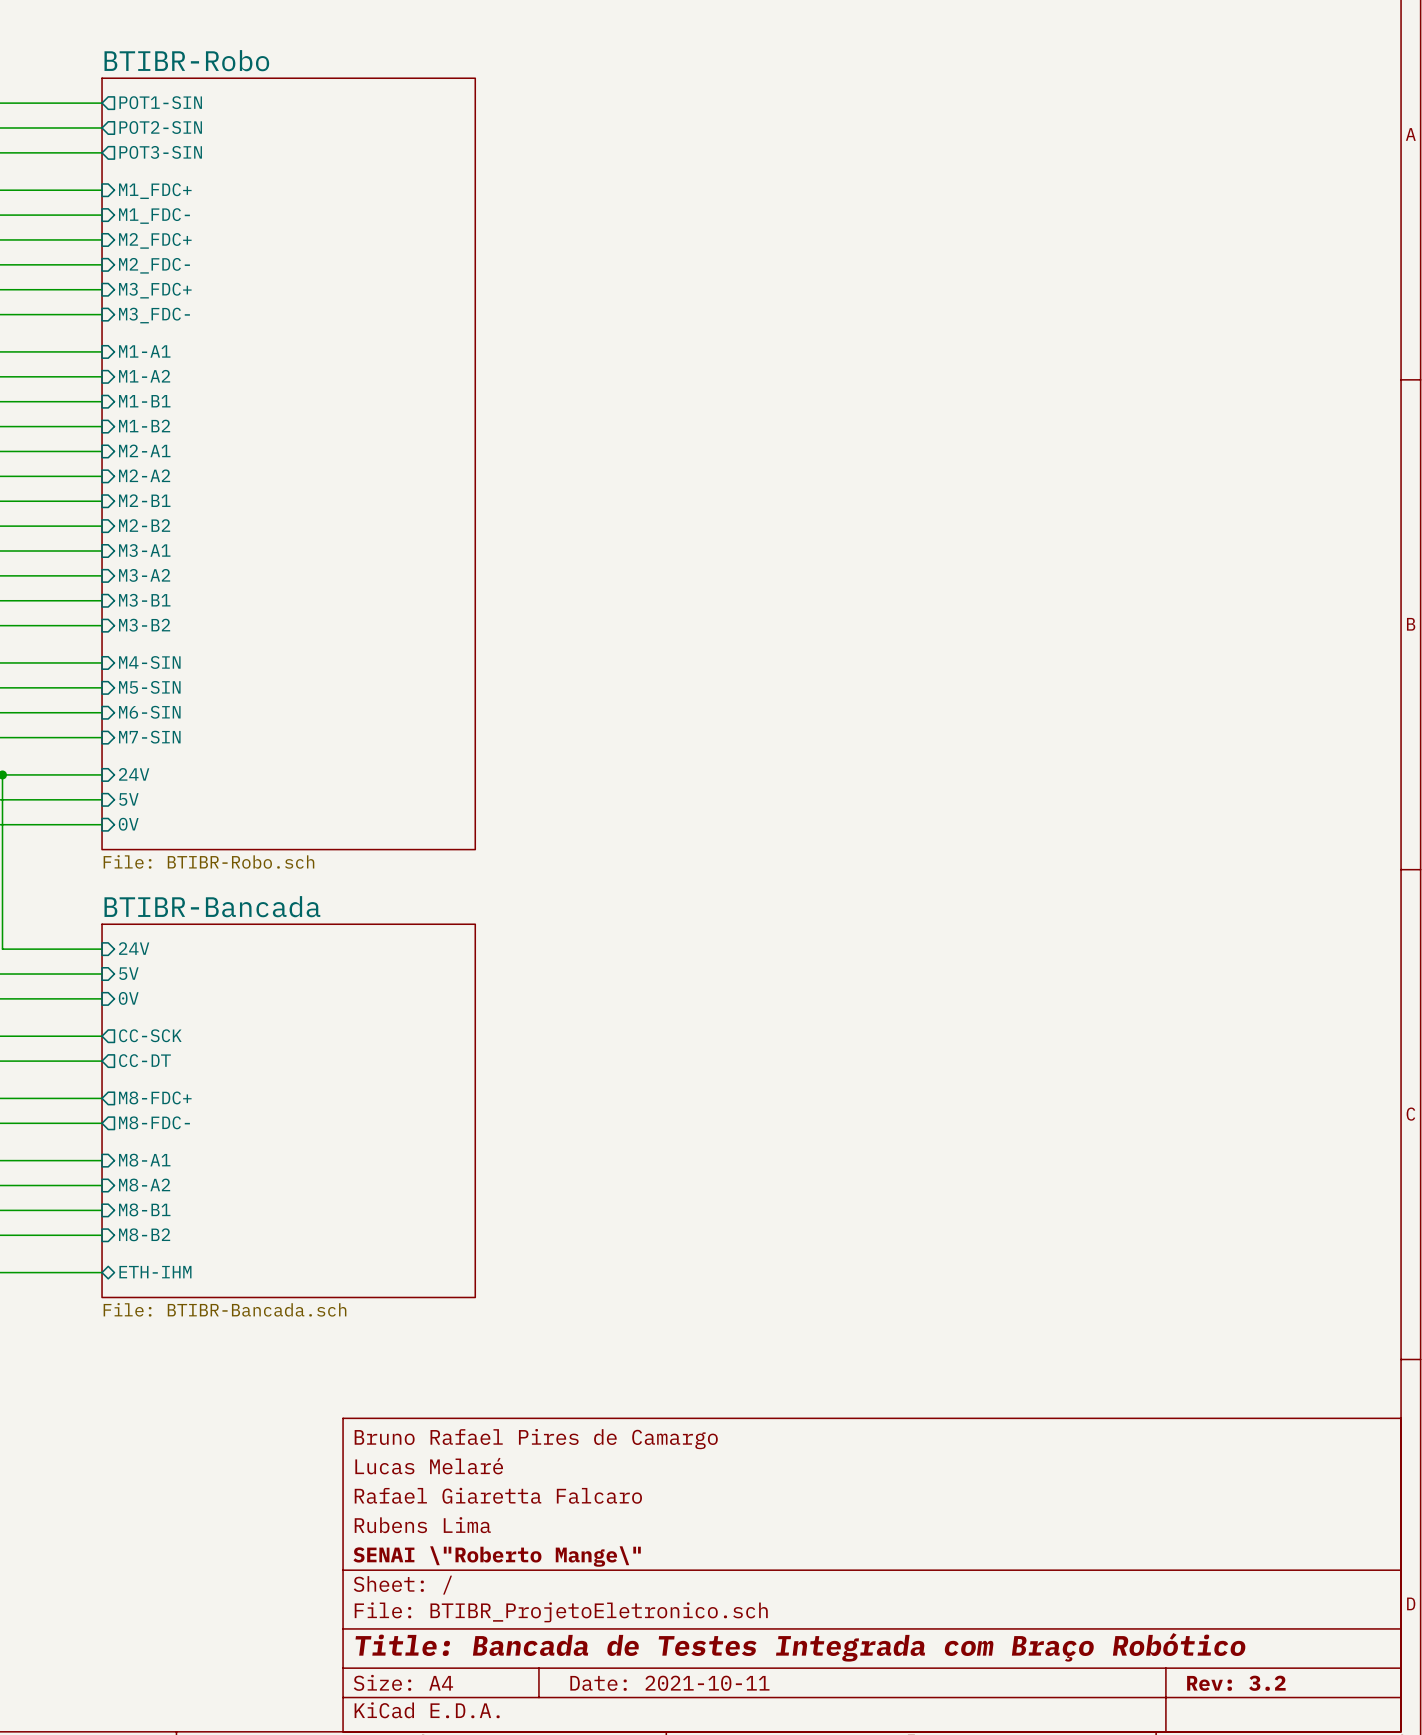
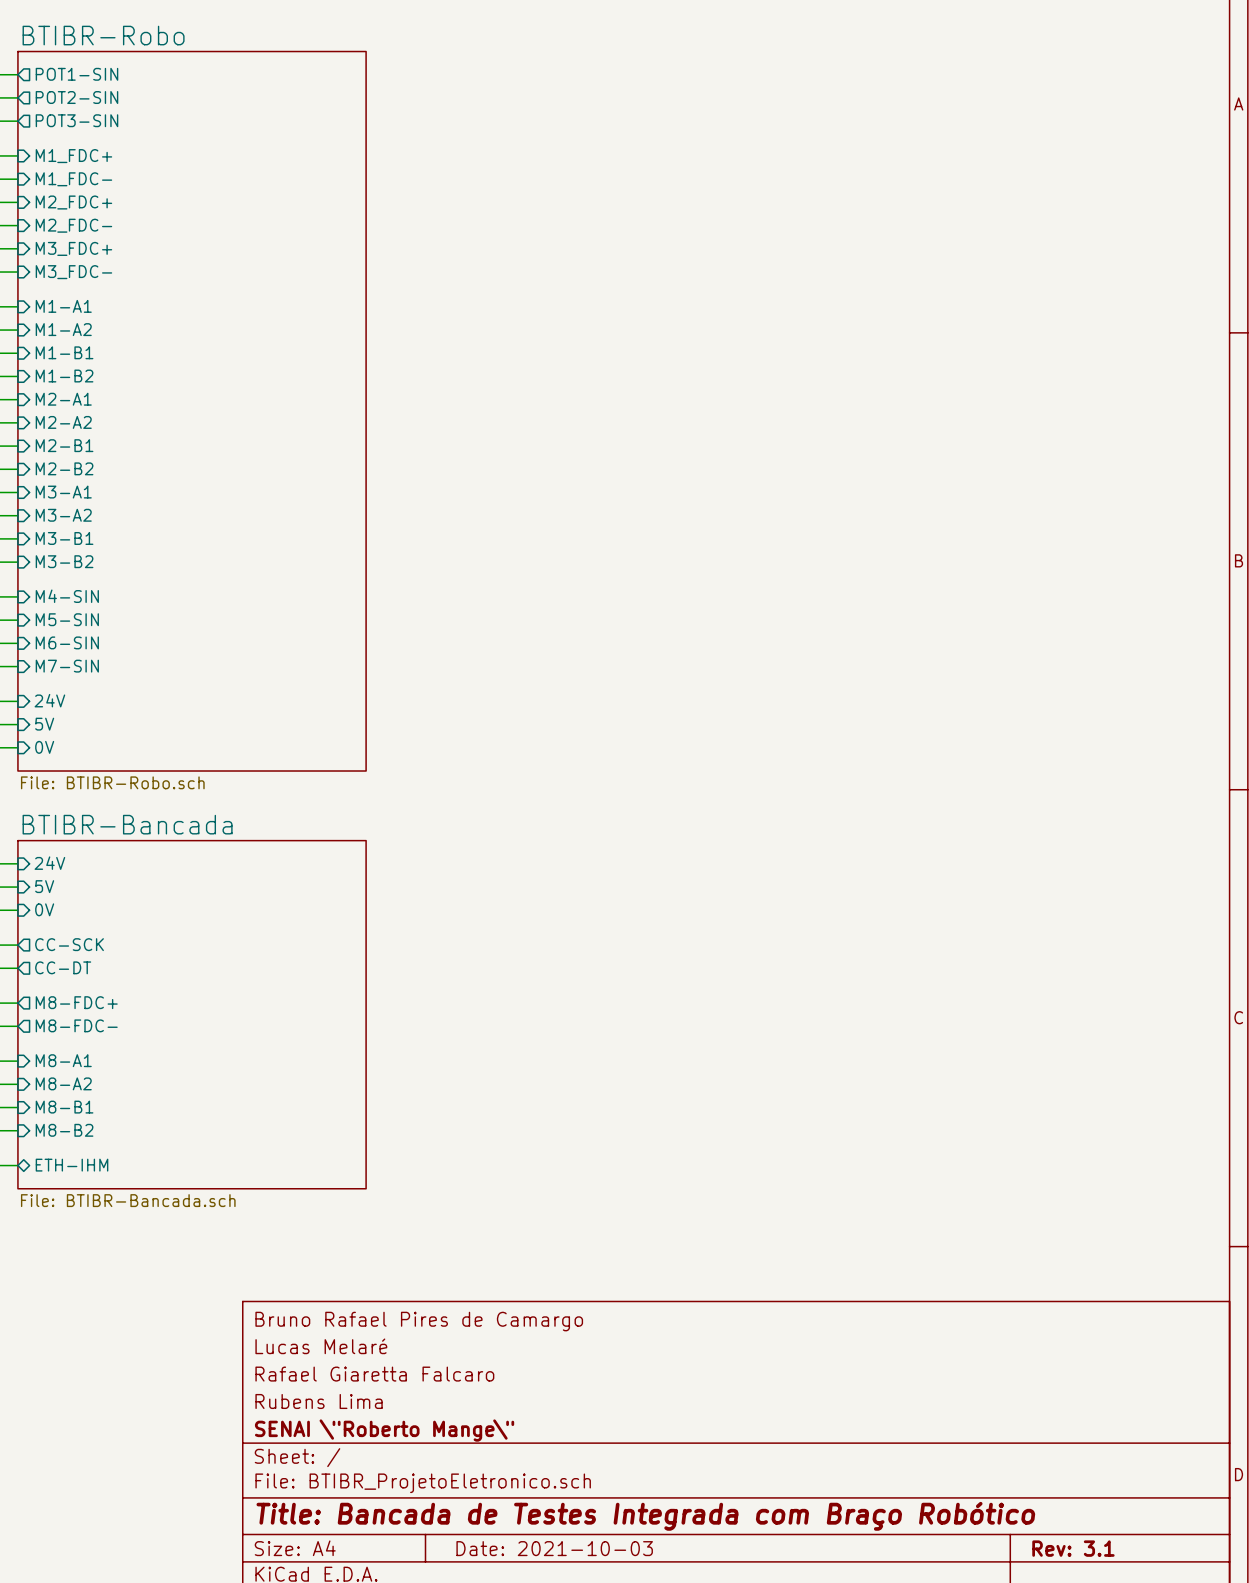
title block: Date: 2021-10-11 (669, 1683) -> Date: 2021-10-03 (554, 1548)
title block: Rev: 3.2 (1236, 1683) -> Rev: 3.1 (1073, 1548)

